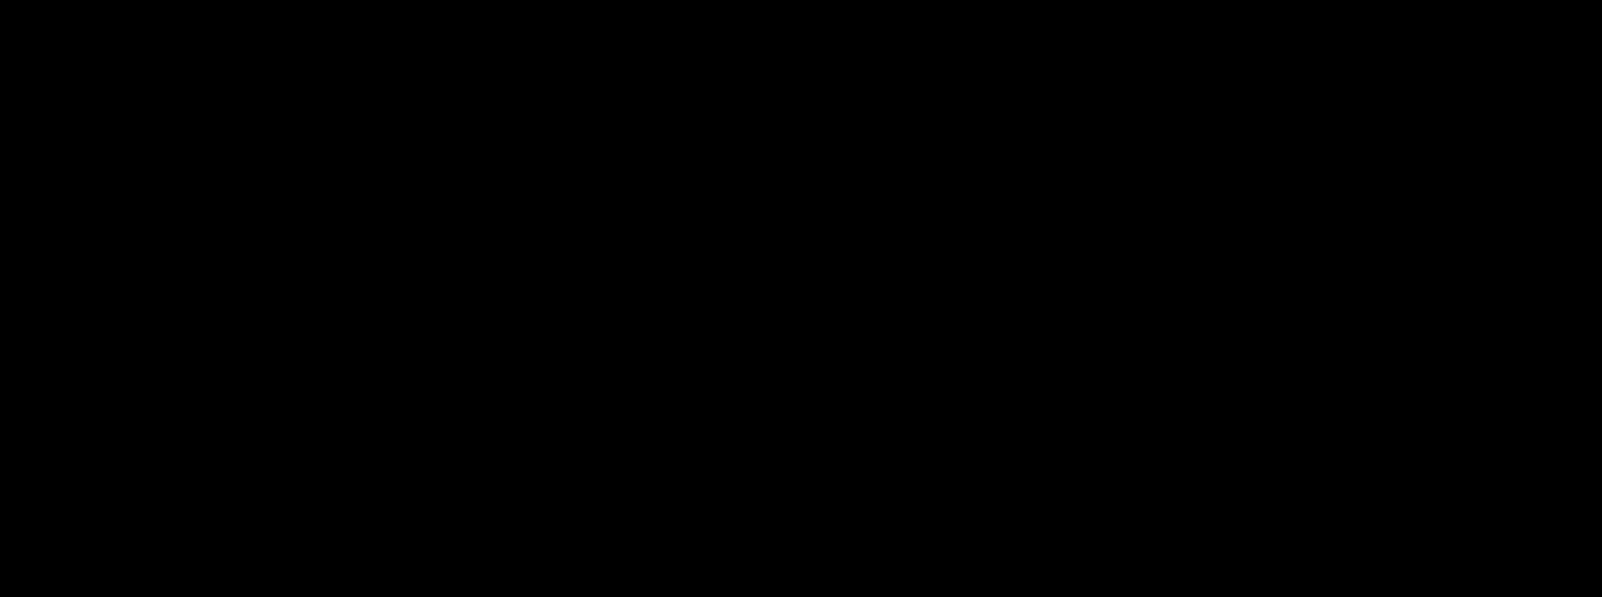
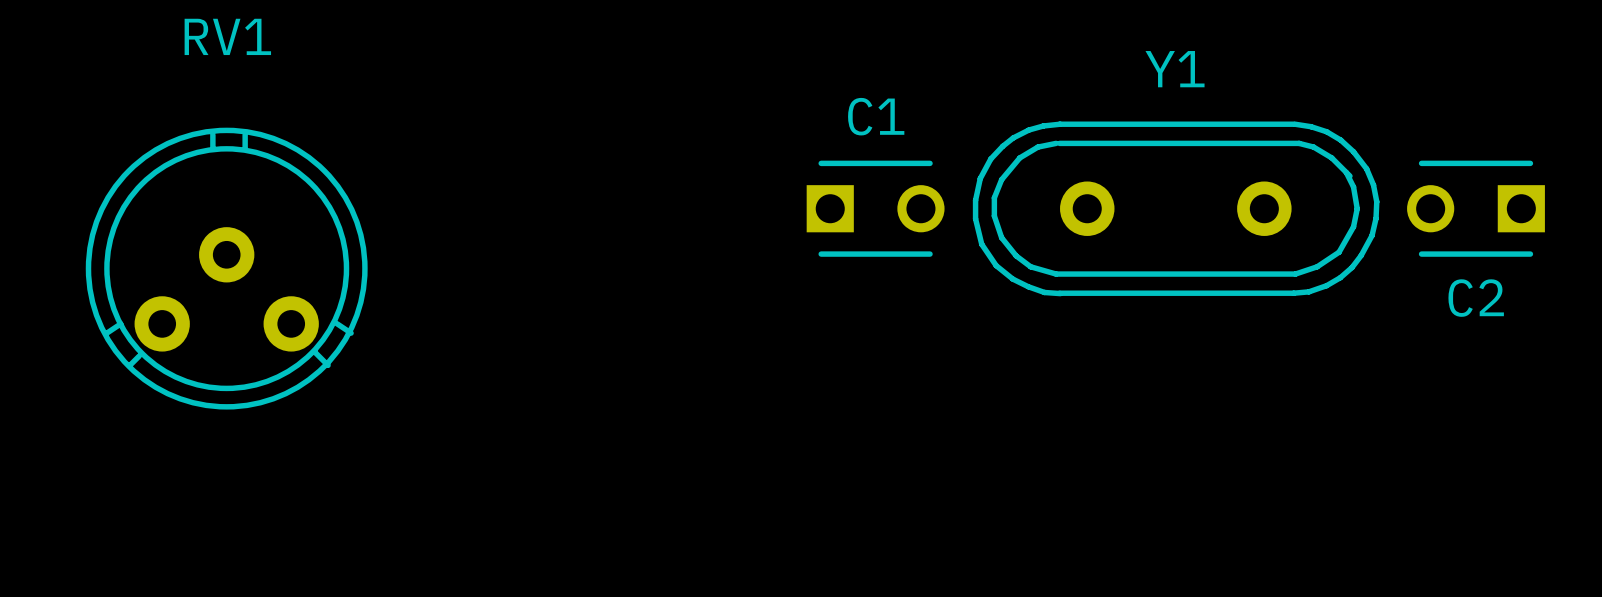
C1: none -> (875, 208)
Y1: none -> (1176, 208)
C2: none -> (1475, 208)
RV1: none -> (226, 268)

